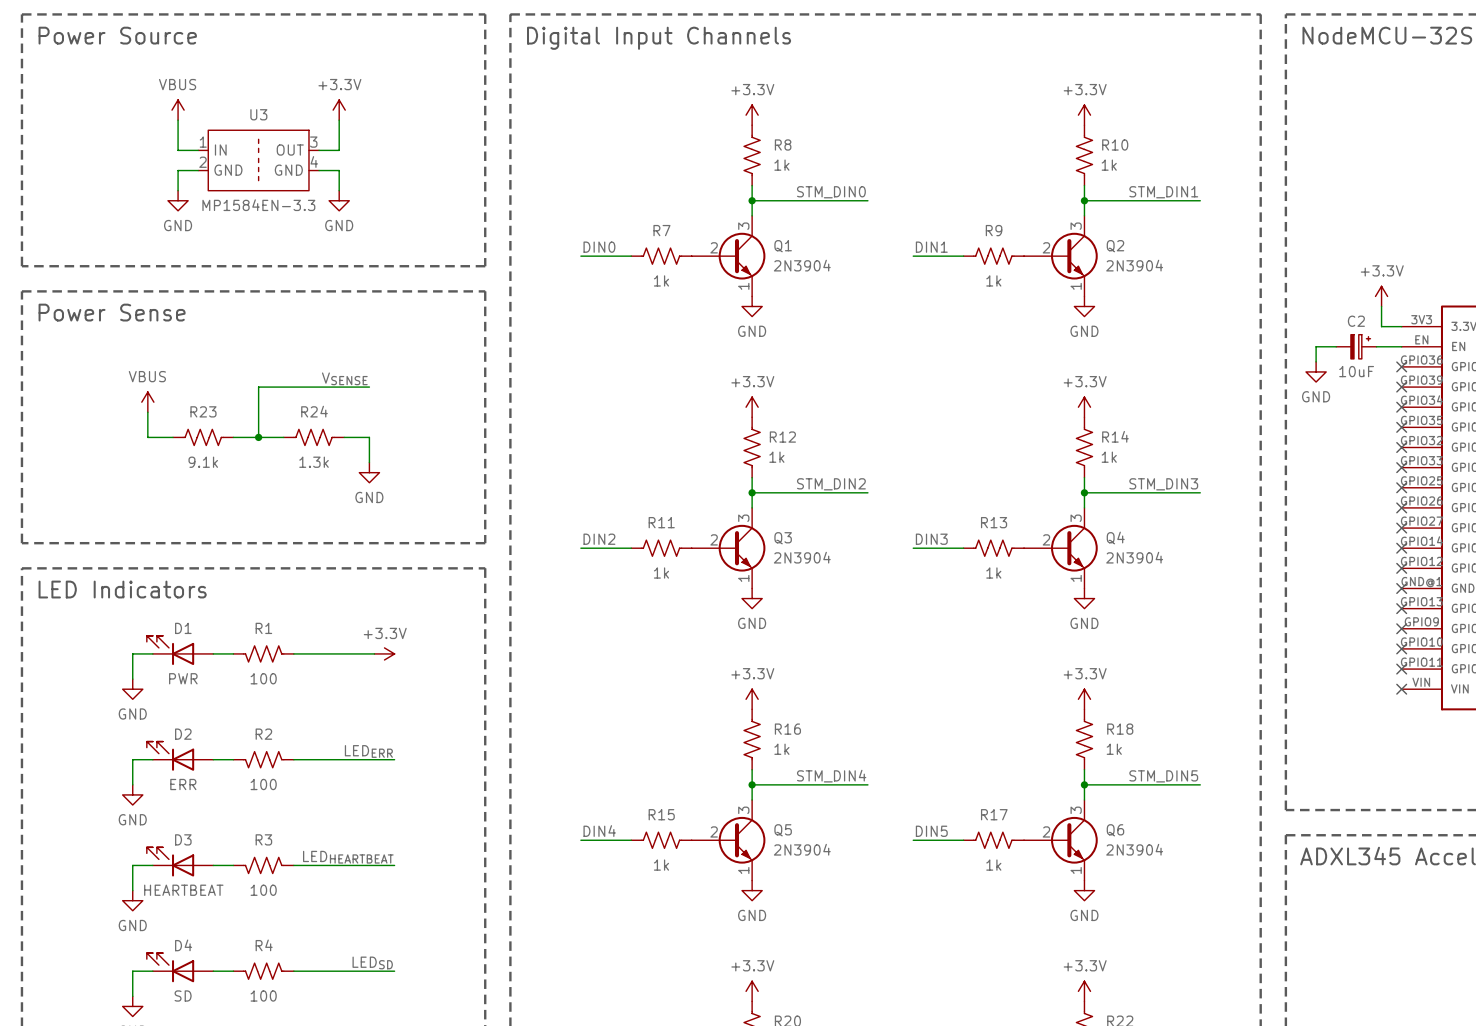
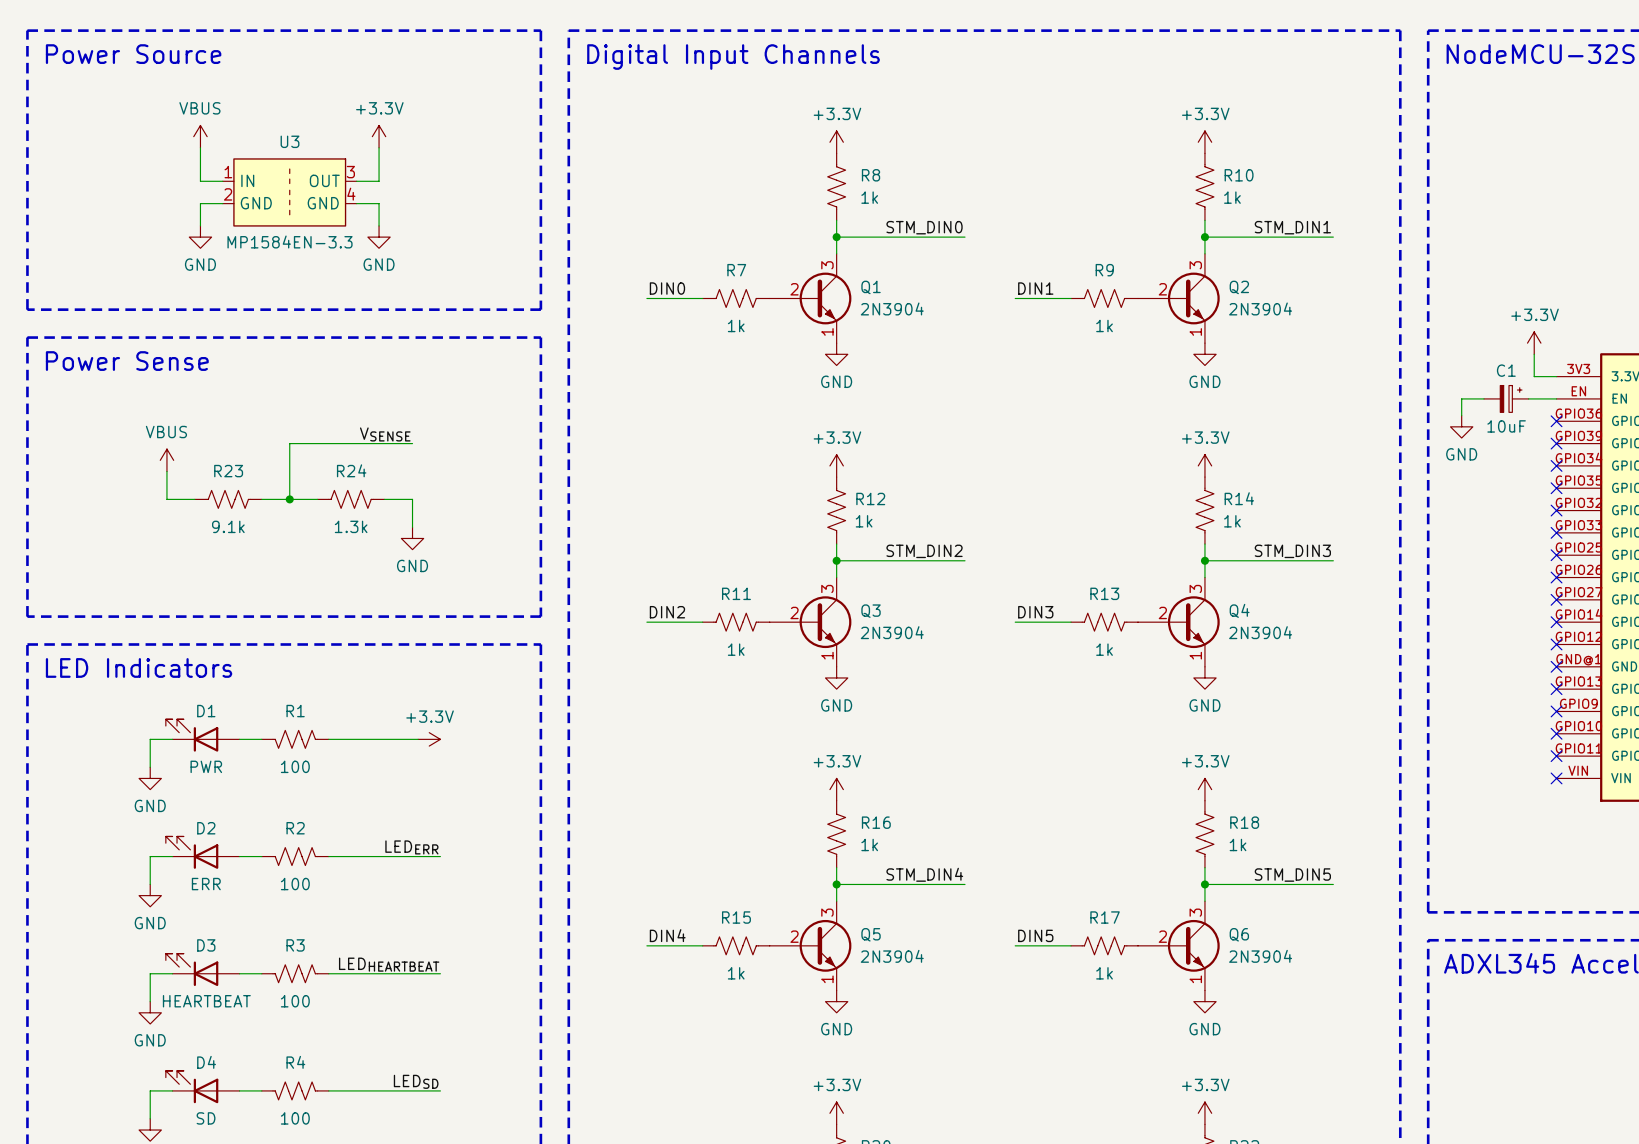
C2 name: C2 (1356, 321) -> C1 (1506, 370)

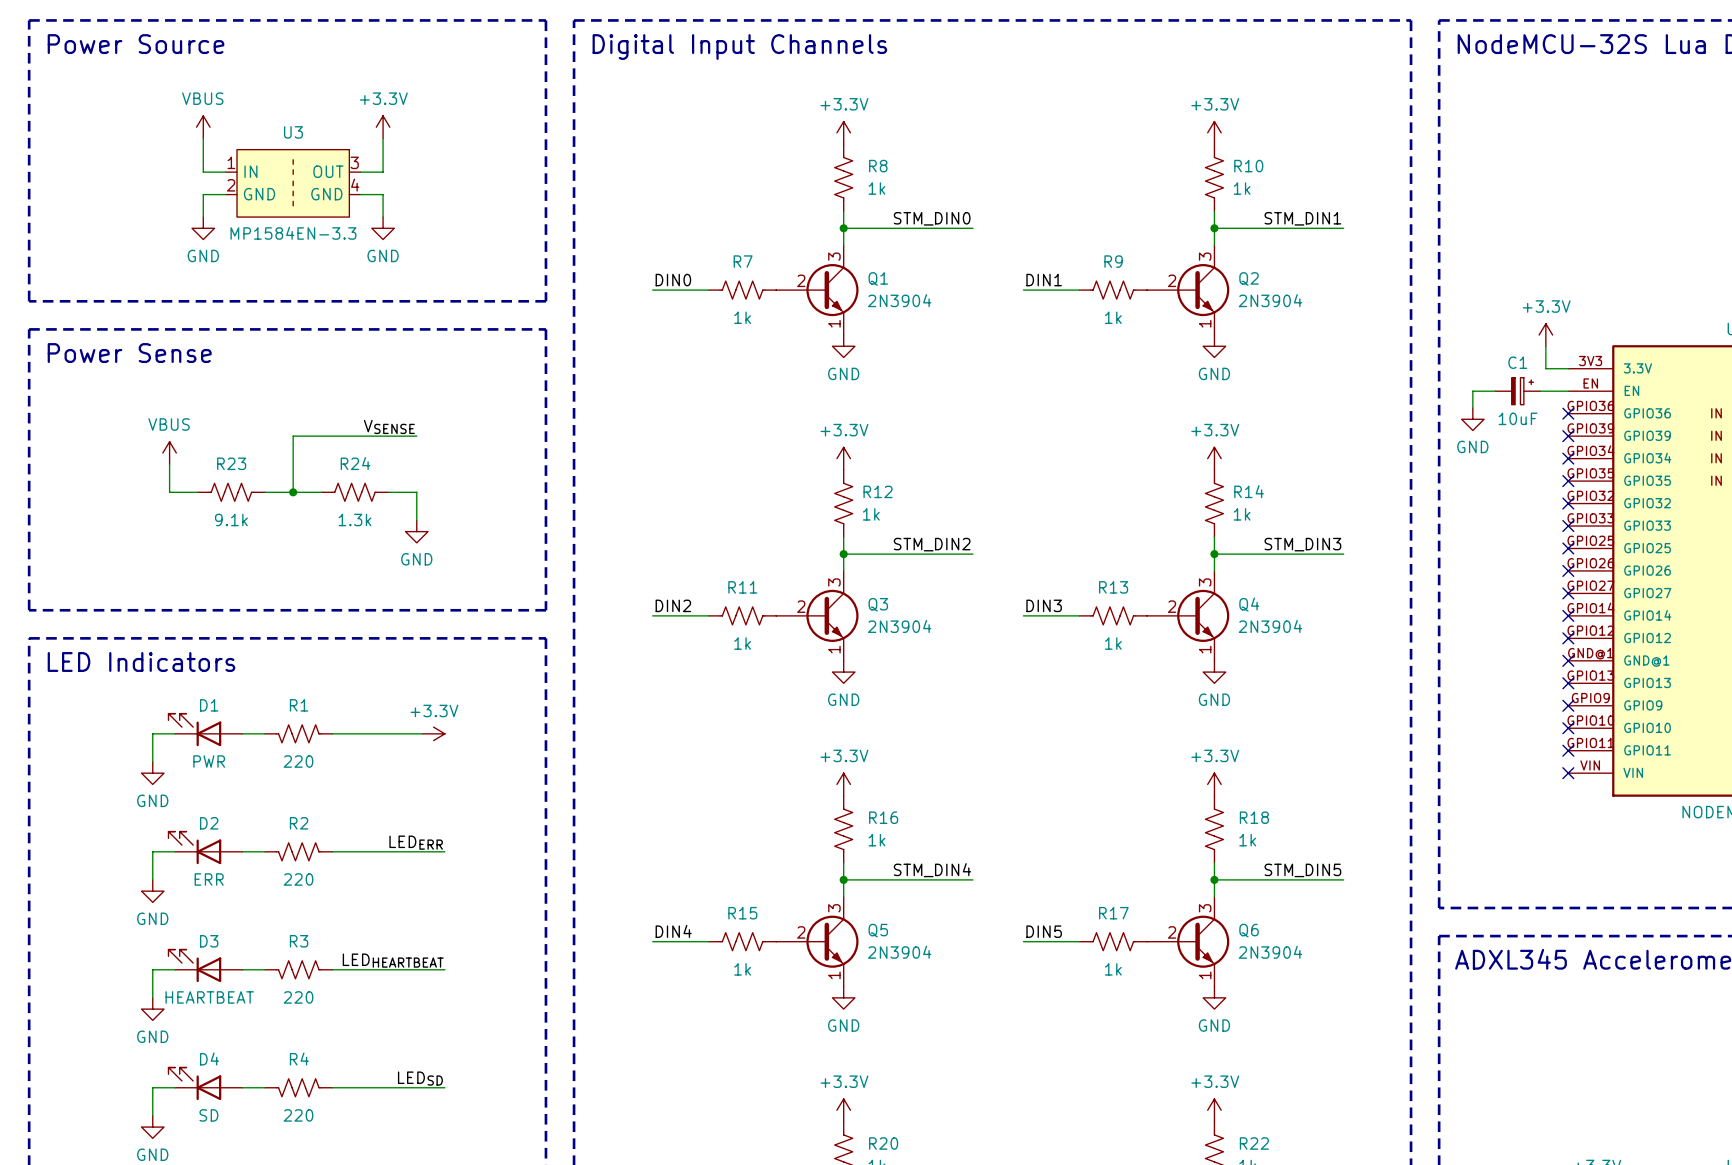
R1 value: 100 (295, 766) -> 220 (298, 761)
R2 value: 100 (295, 884) -> 220 (298, 879)
R3 value: 100 (295, 1001) -> 220 (298, 997)
R4 value: 100 (295, 1118) -> 220 (298, 1115)

